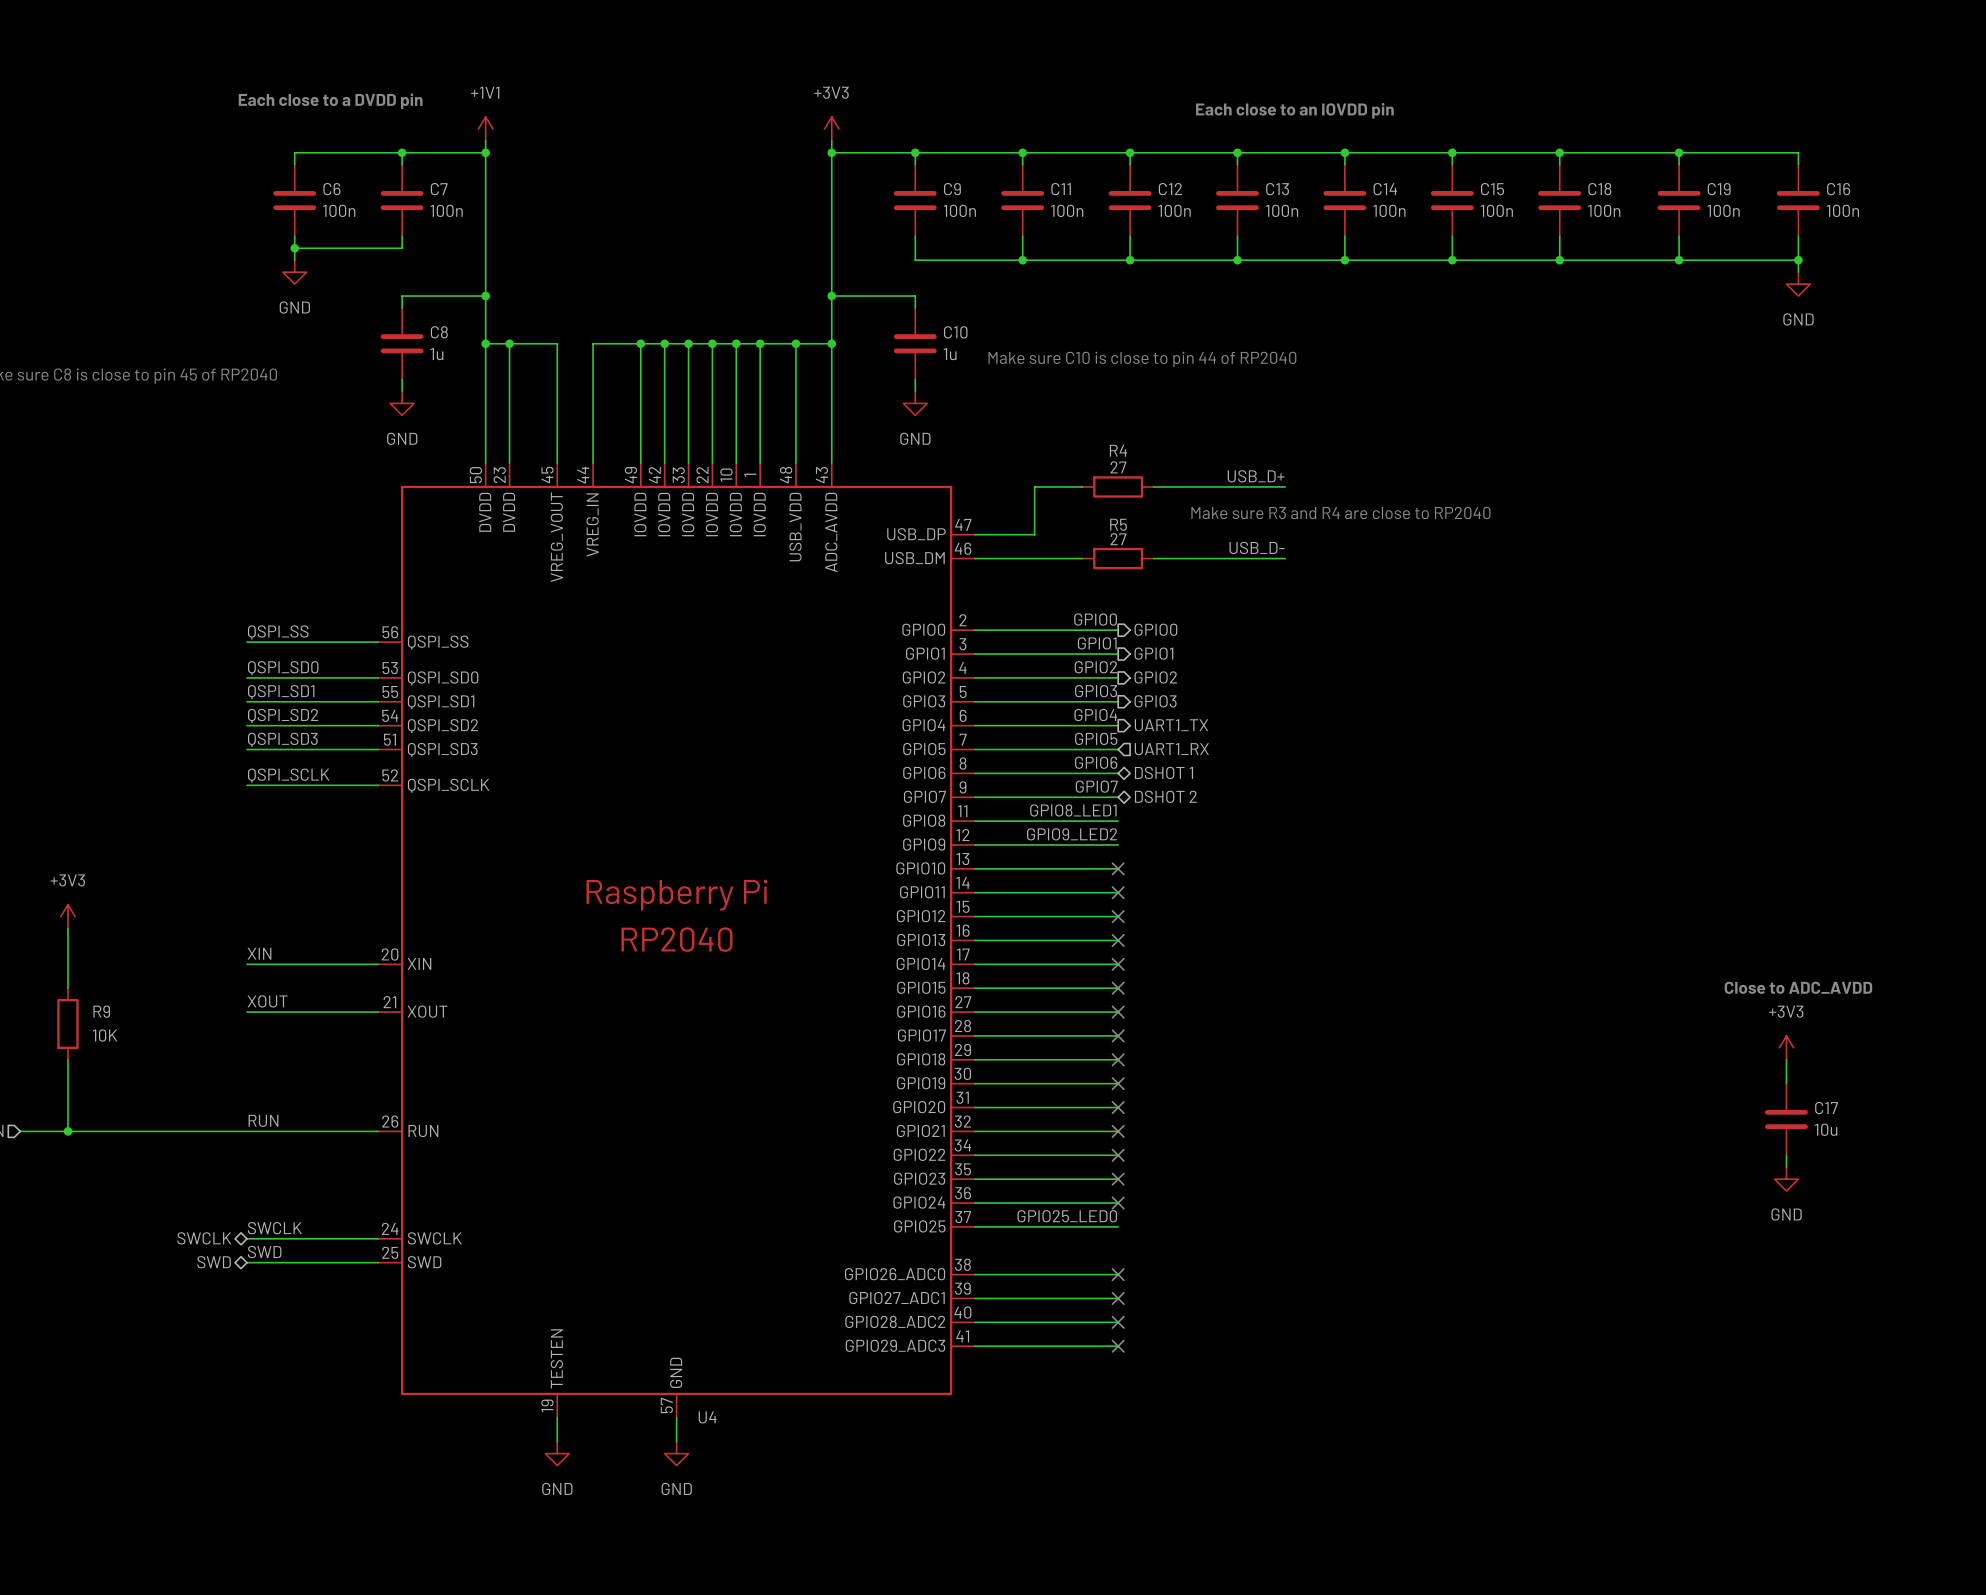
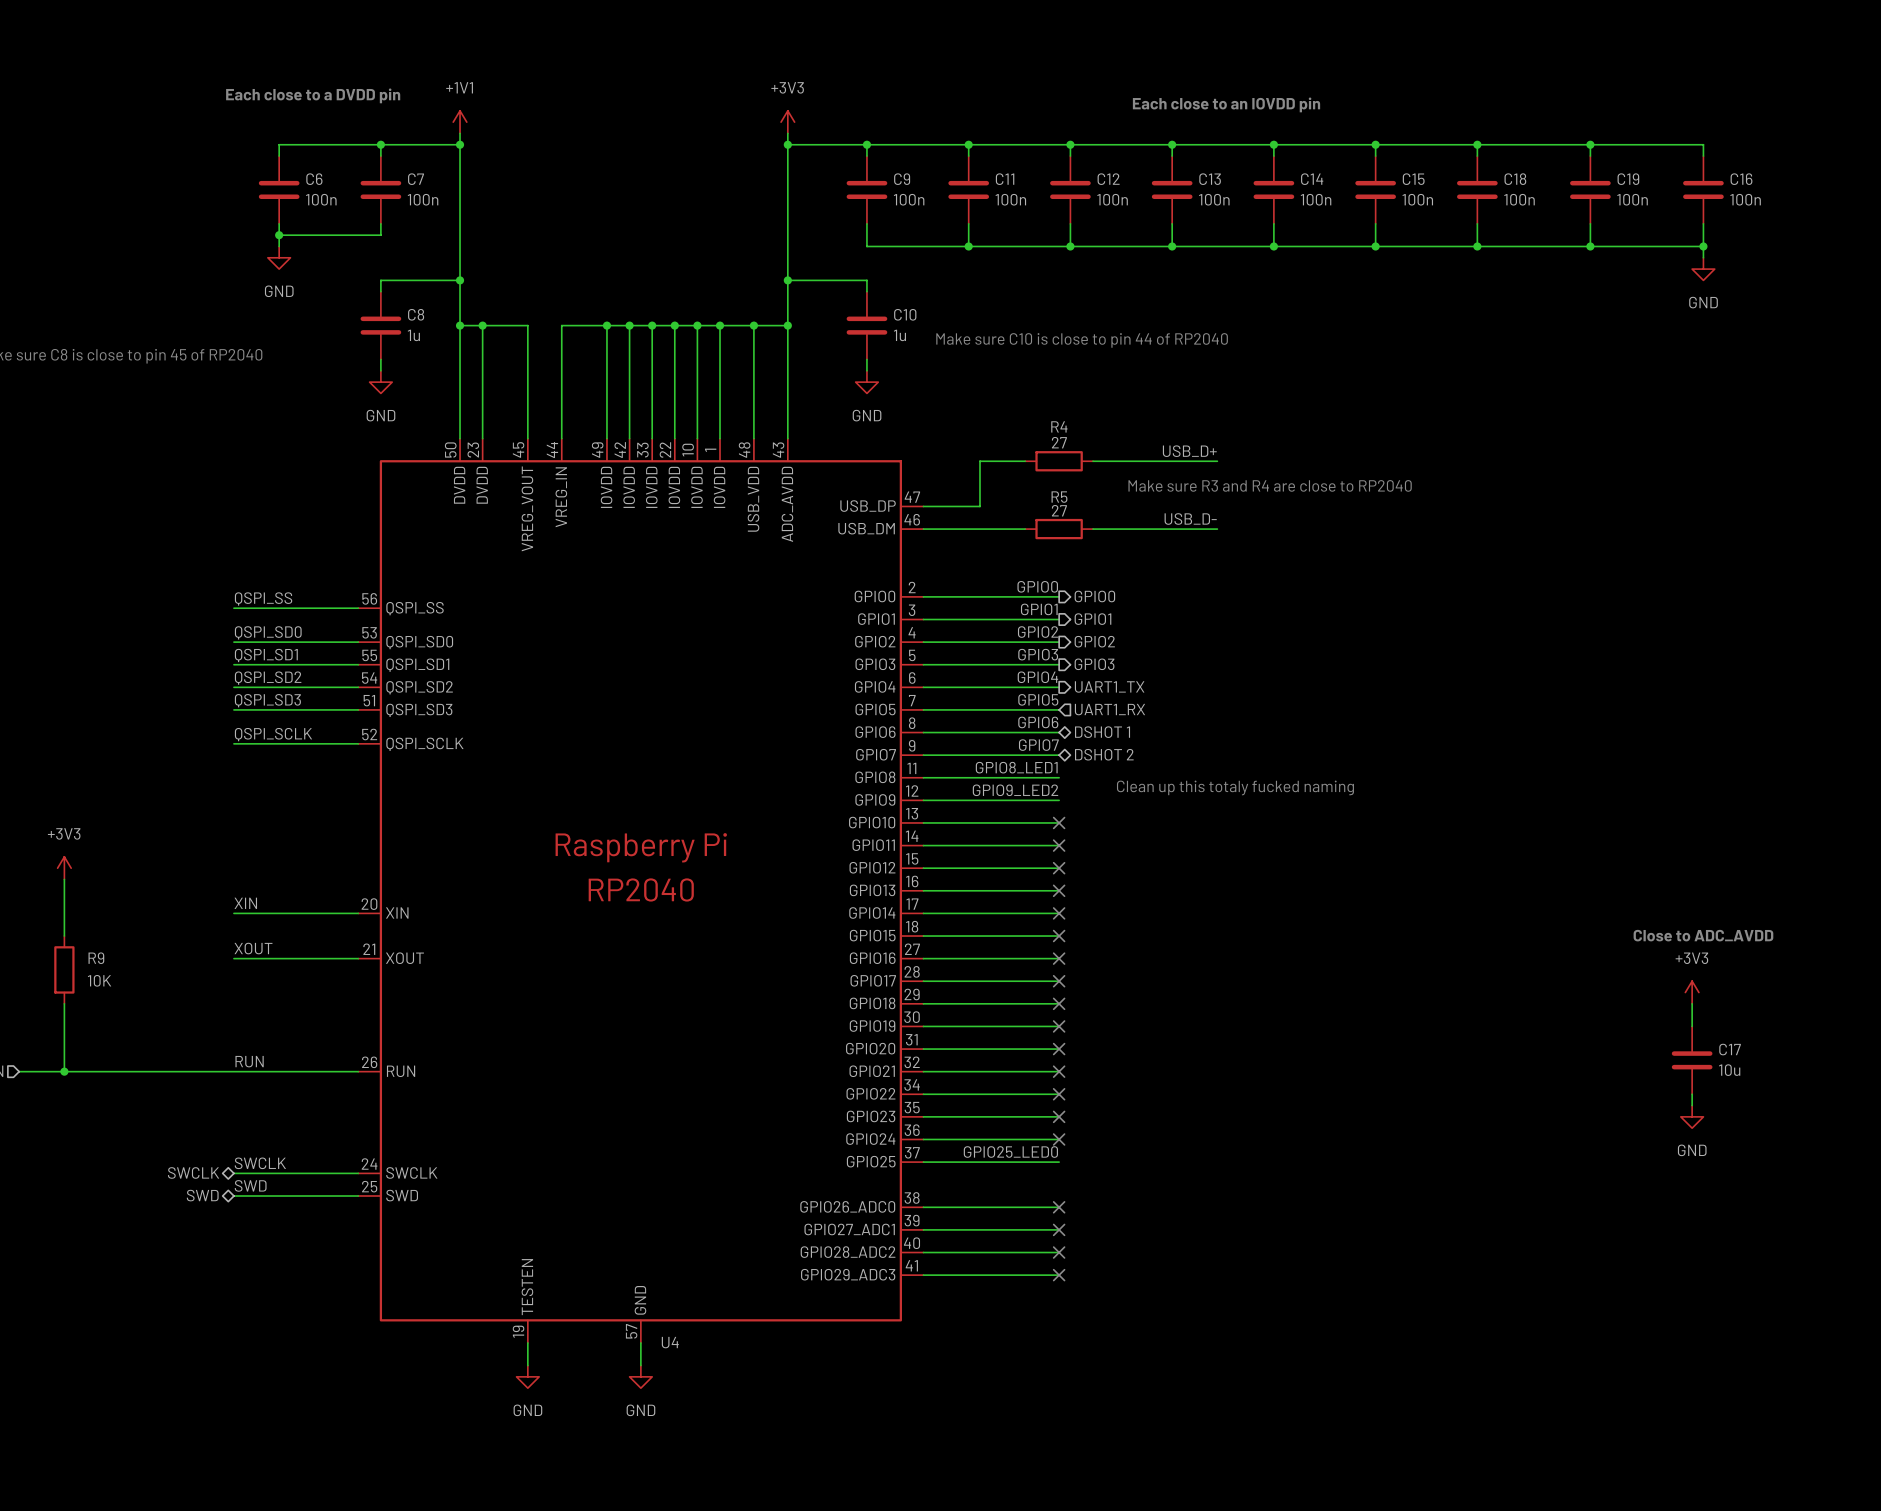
text: none -> Clean up this totaly fucked naming (1235, 787)

